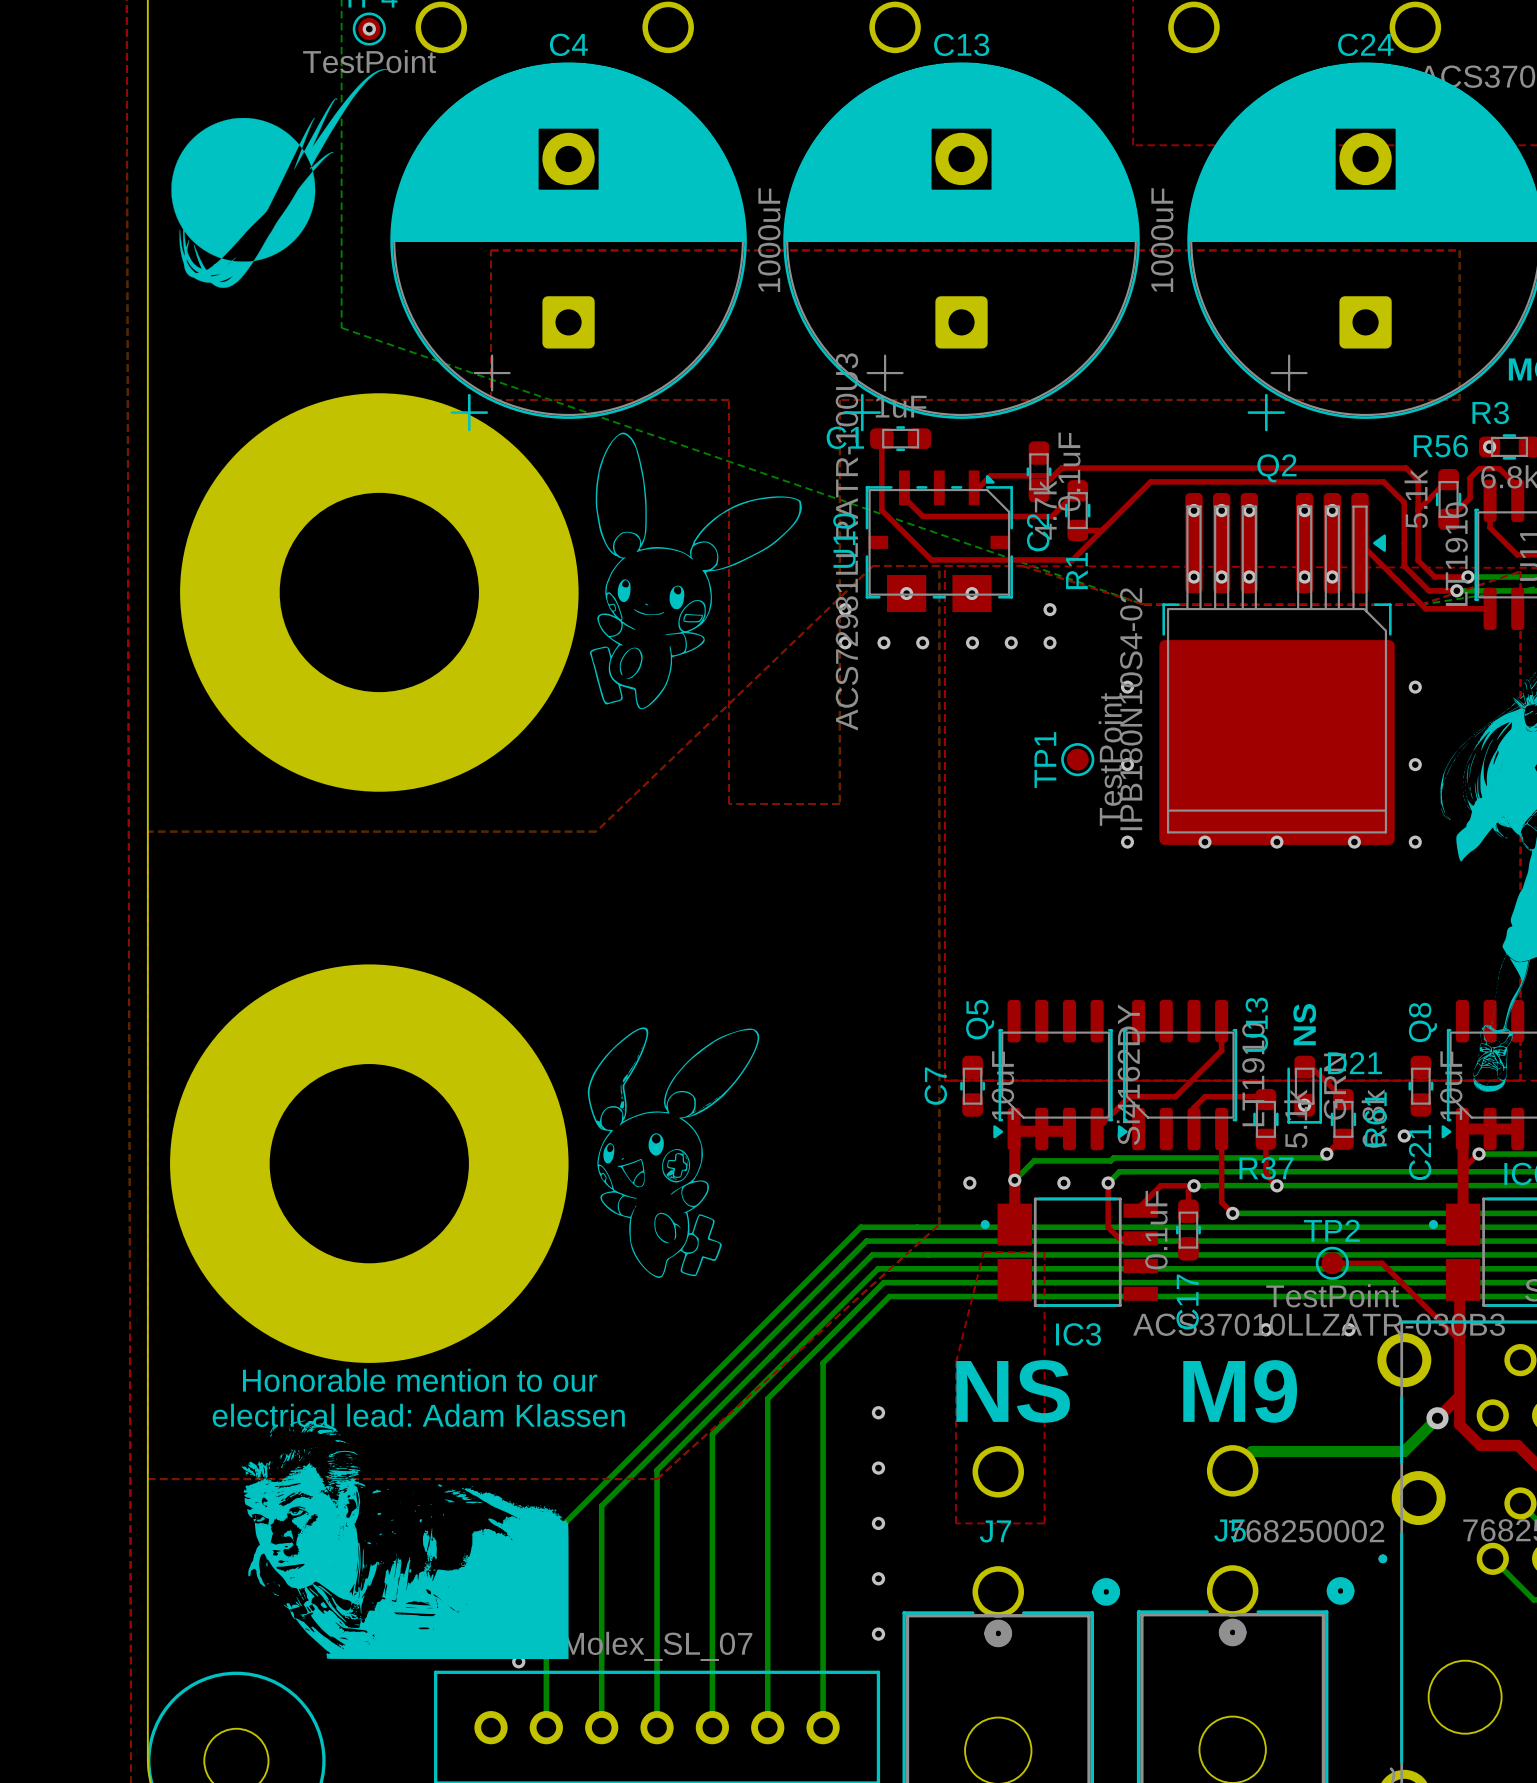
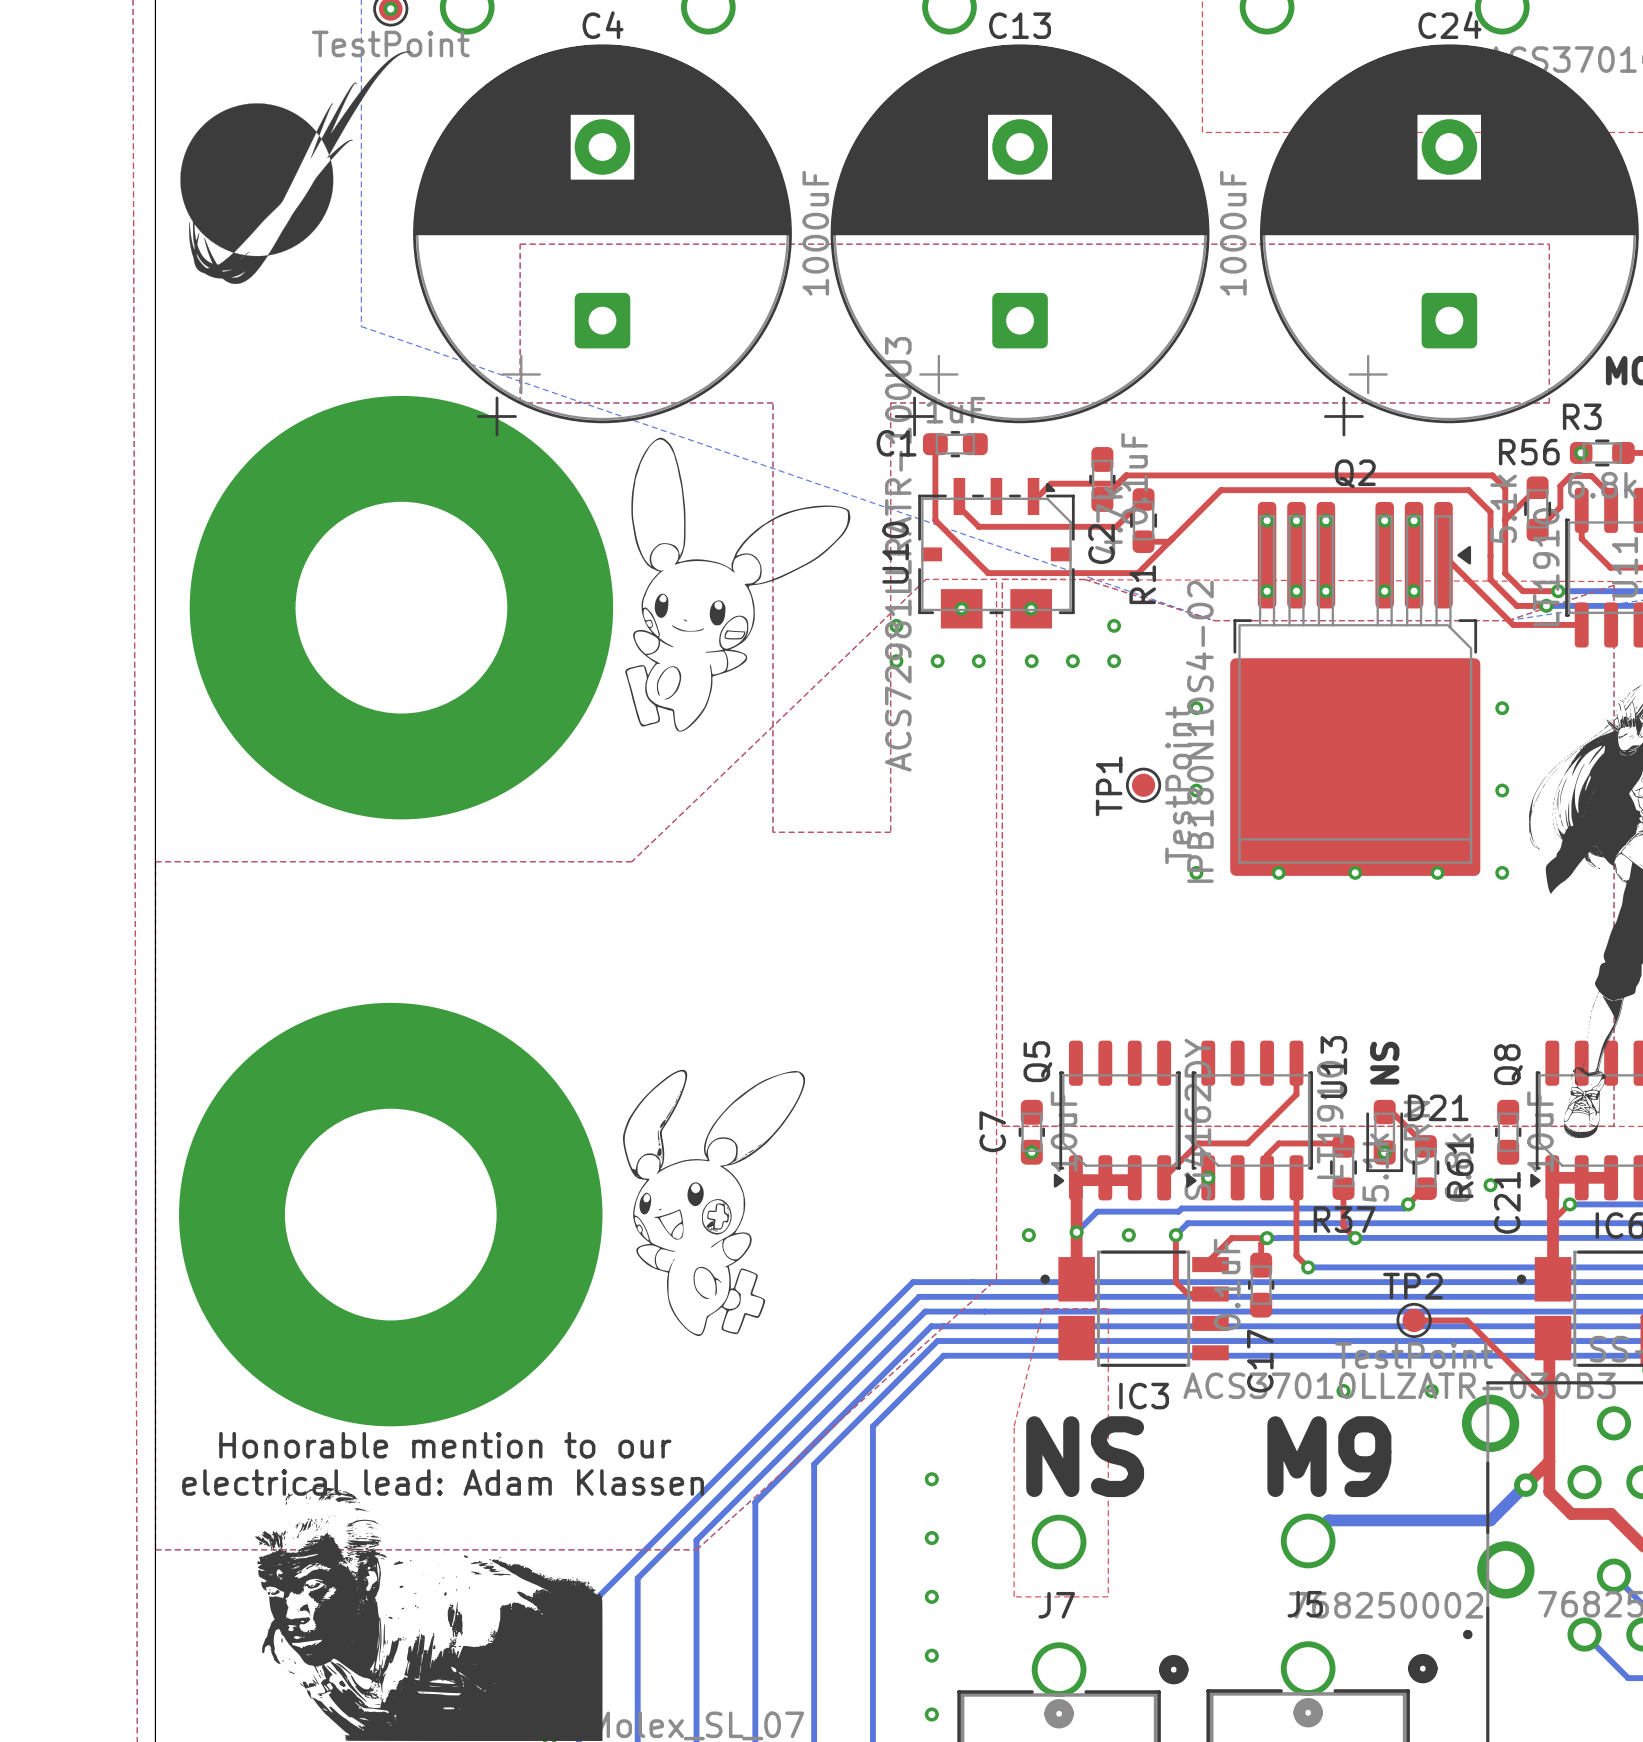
via: none -> (1031, 1152)
via: none -> (1208, 1177)

